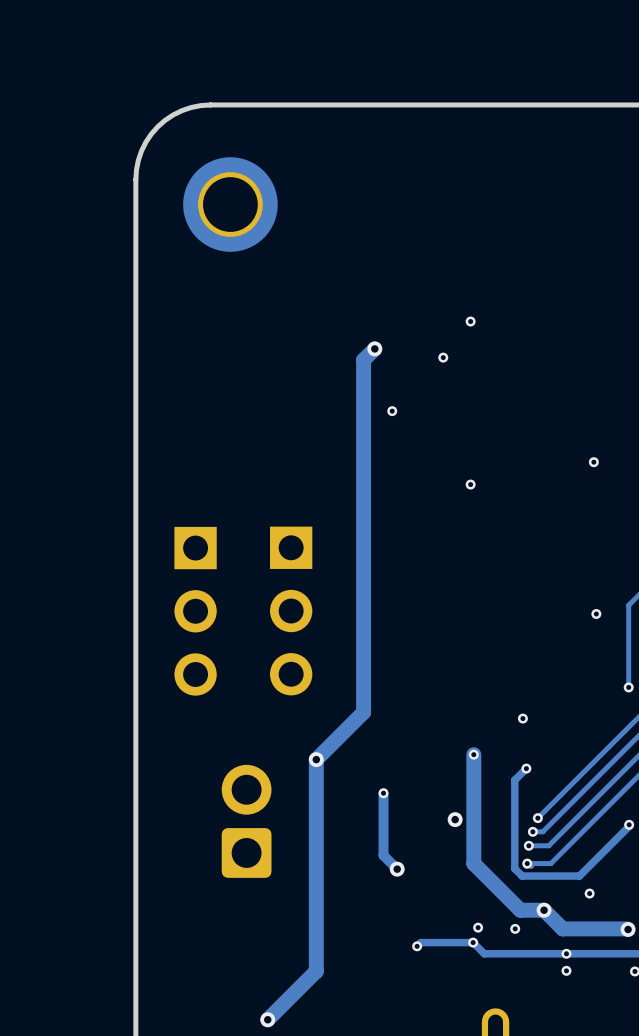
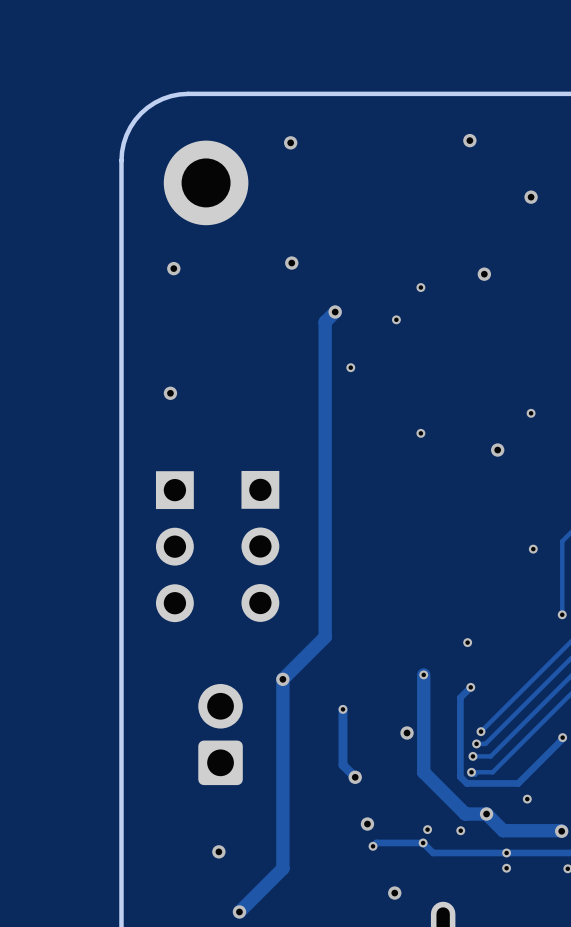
via: none -> (469, 140)
via: none -> (290, 142)
via: none -> (531, 197)
via: none -> (291, 263)
via: none -> (173, 268)
via: none -> (484, 274)
via: none -> (170, 393)
via: none -> (497, 450)
via: none -> (367, 824)
via: none -> (218, 851)
via: none -> (394, 893)

